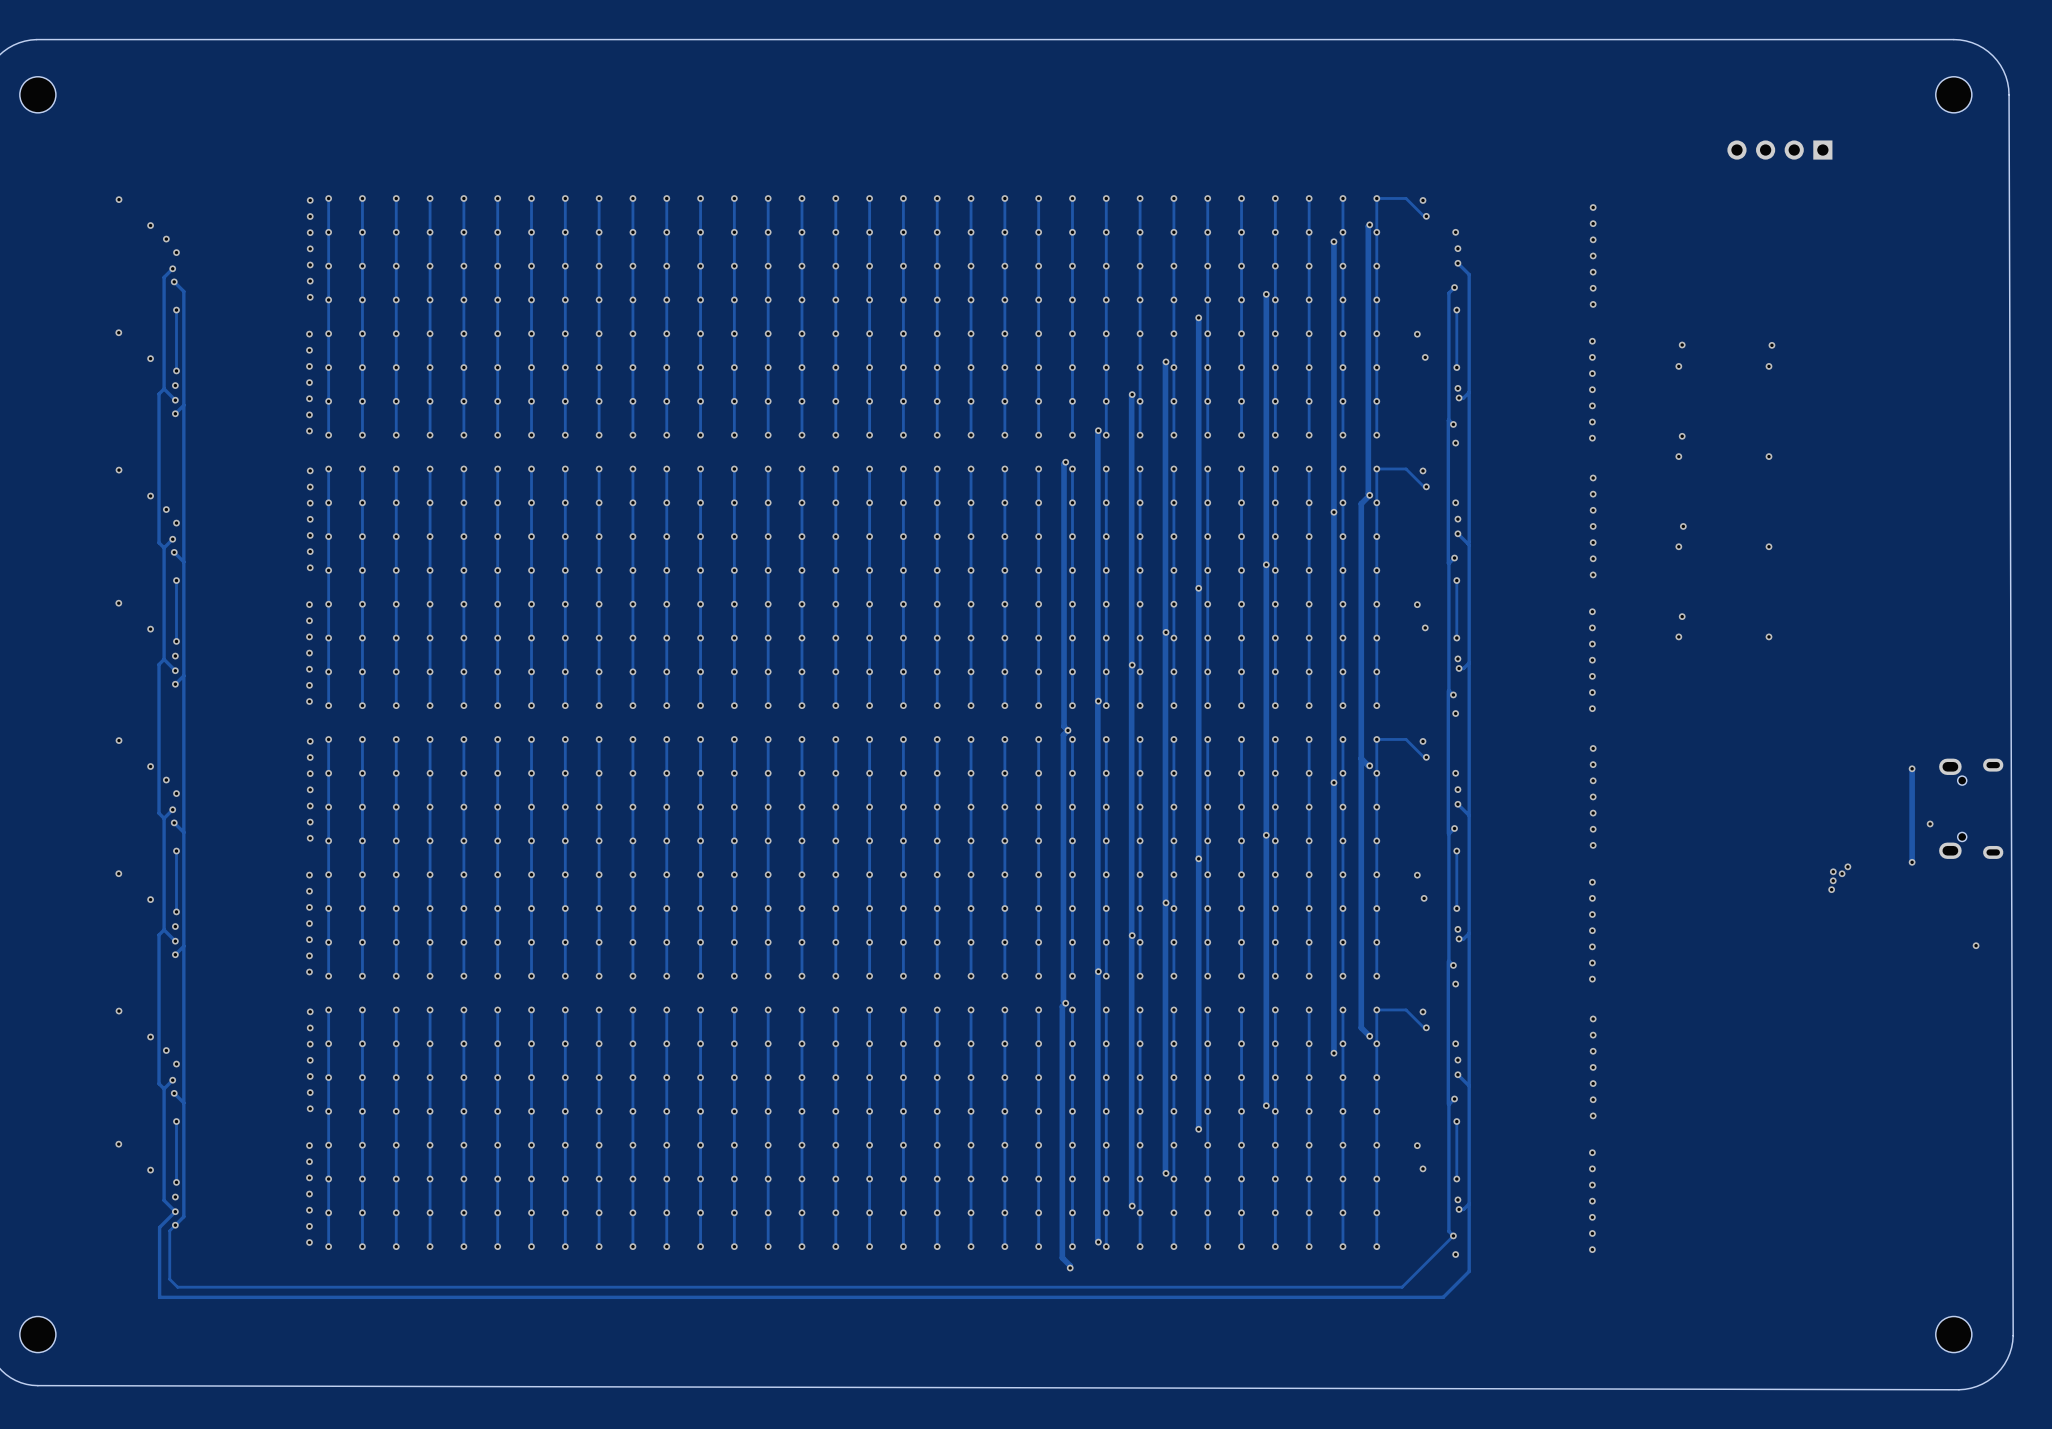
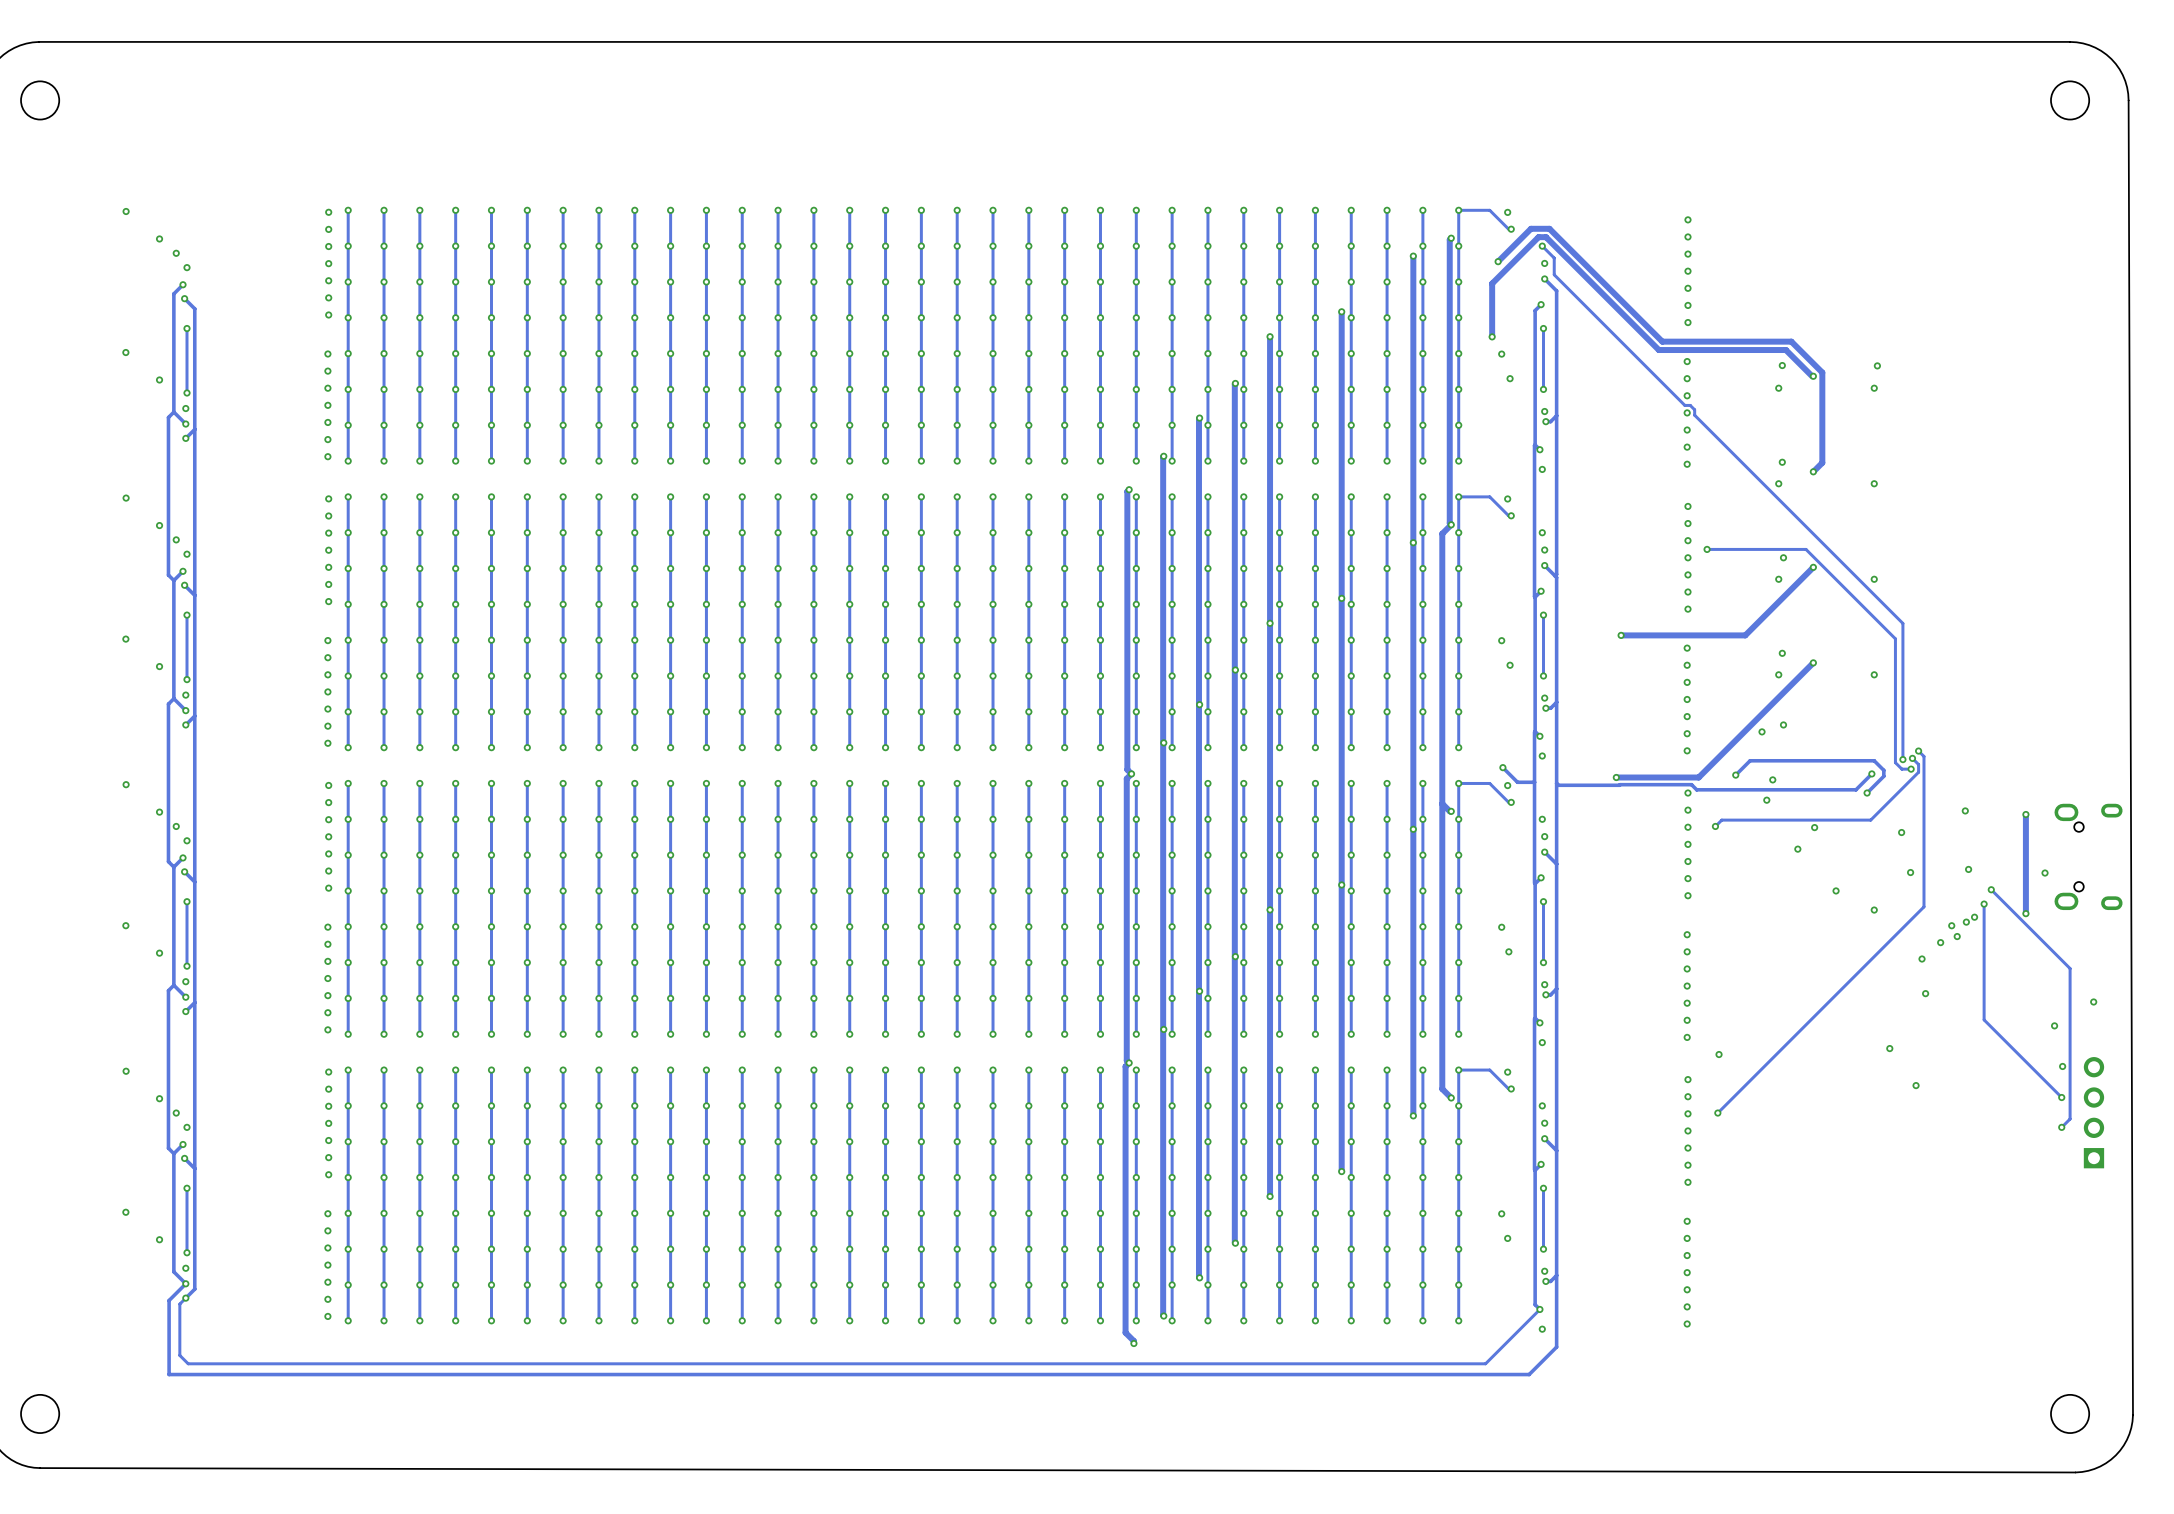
part: (1779, 150) -> none
track: none -> (1542, 246) (1554, 258) (1554, 274) (1684, 405) (1690, 405) (1694, 409) (1694, 415) (1902, 623) (1902, 759)
track: none -> (1498, 261) (1530, 228) (1549, 228) (1662, 341) (1791, 341) (1822, 372) (1822, 462) (1813, 471)
via: none -> (1498, 261)
track: none -> (1492, 336) (1492, 283) (1538, 237) (1546, 237) (1658, 350) (1785, 350) (1812, 376)
via: none -> (1492, 336)
via: none -> (1813, 376)
via: none -> (1813, 471)
track: none -> (1707, 549) (1806, 549) (1895, 638) (1895, 762) (1901, 769) (1911, 769)
via: none -> (1707, 549)
track: none -> (1813, 567) (1745, 635) (1621, 635)
via: none -> (1813, 567)
via: none -> (1621, 635)
track: none -> (1813, 662) (1698, 777) (1616, 777)
via: none -> (1813, 662)
via: none -> (1783, 724)
via: none -> (1762, 731)
track: none -> (1918, 751) (1923, 756) (1923, 906) (1717, 1113)
via: none -> (1918, 751)
track: none -> (1912, 758) (1918, 764) (1918, 772) (1870, 820) (1721, 820) (1715, 826)
via: none -> (1912, 758)
via: none -> (1902, 759)
track: none -> (1502, 767) (1517, 782) (1534, 782)
via: none -> (1502, 767)
via: none -> (1911, 769)
track: none -> (1871, 773) (1855, 789) (1696, 789) (1691, 784) (1558, 785) (1556, 783)
via: none -> (1871, 773)
track: none -> (1735, 775) (1750, 760) (1874, 760) (1883, 770) (1883, 776) (1867, 793)
via: none -> (1735, 775)
via: none -> (1616, 777)
via: none -> (1772, 779)
via: none -> (1867, 793)
via: none -> (1766, 800)
via: none -> (1965, 810)
via: none -> (1715, 826)
via: none -> (1814, 827)
via: none -> (1901, 832)
via: none -> (1797, 849)
via: none -> (1968, 869)
via: none -> (1910, 872)
track: none -> (1991, 889) (2070, 968) (2070, 1119) (2061, 1127)
via: none -> (1991, 889)
via: none -> (1836, 890)
track: none -> (1984, 904) (1984, 1019) (2061, 1097)
via: none -> (1984, 904)
via: none -> (1874, 910)
via: none -> (1974, 917)
via: (1847, 866) -> none
via: none -> (1966, 922)
via: (1833, 871) -> none
via: (1833, 880) -> none
via: none -> (1957, 936)
via: none -> (1922, 959)
via: none -> (1925, 993)
via: none -> (2054, 1025)
via: none -> (1889, 1048)
via: none -> (1719, 1054)
via: none -> (2062, 1066)
via: none -> (1916, 1085)
via: none -> (2061, 1097)
via: none -> (1717, 1113)
part: none -> (2093, 1112)
via: none -> (2061, 1127)

